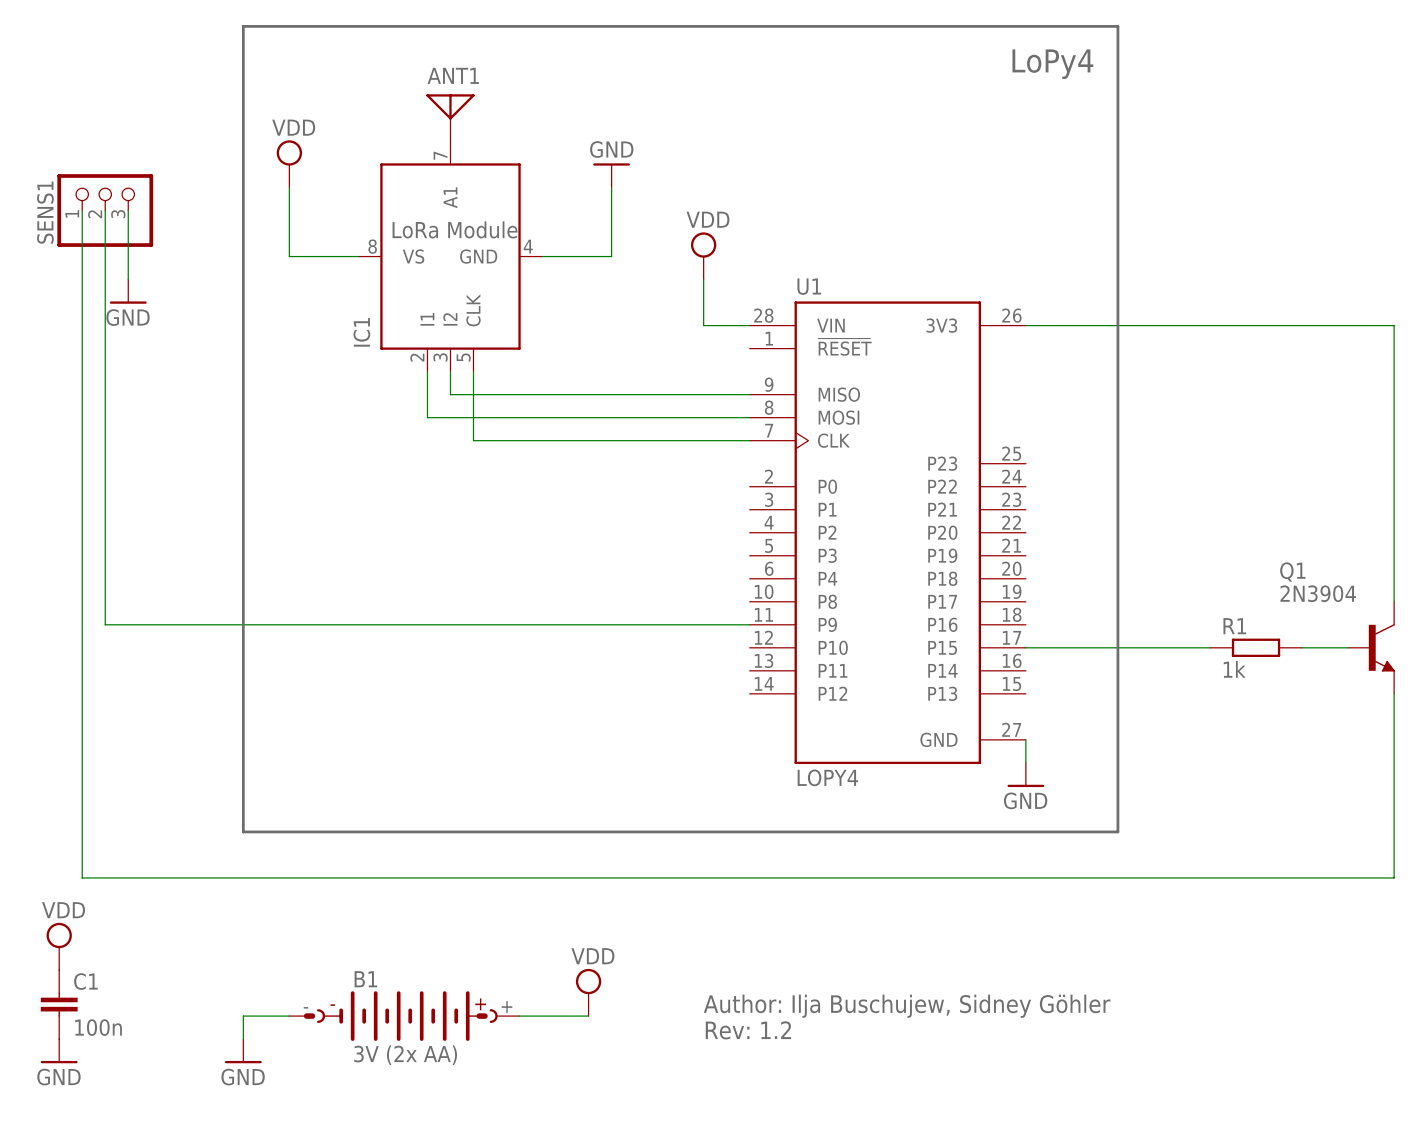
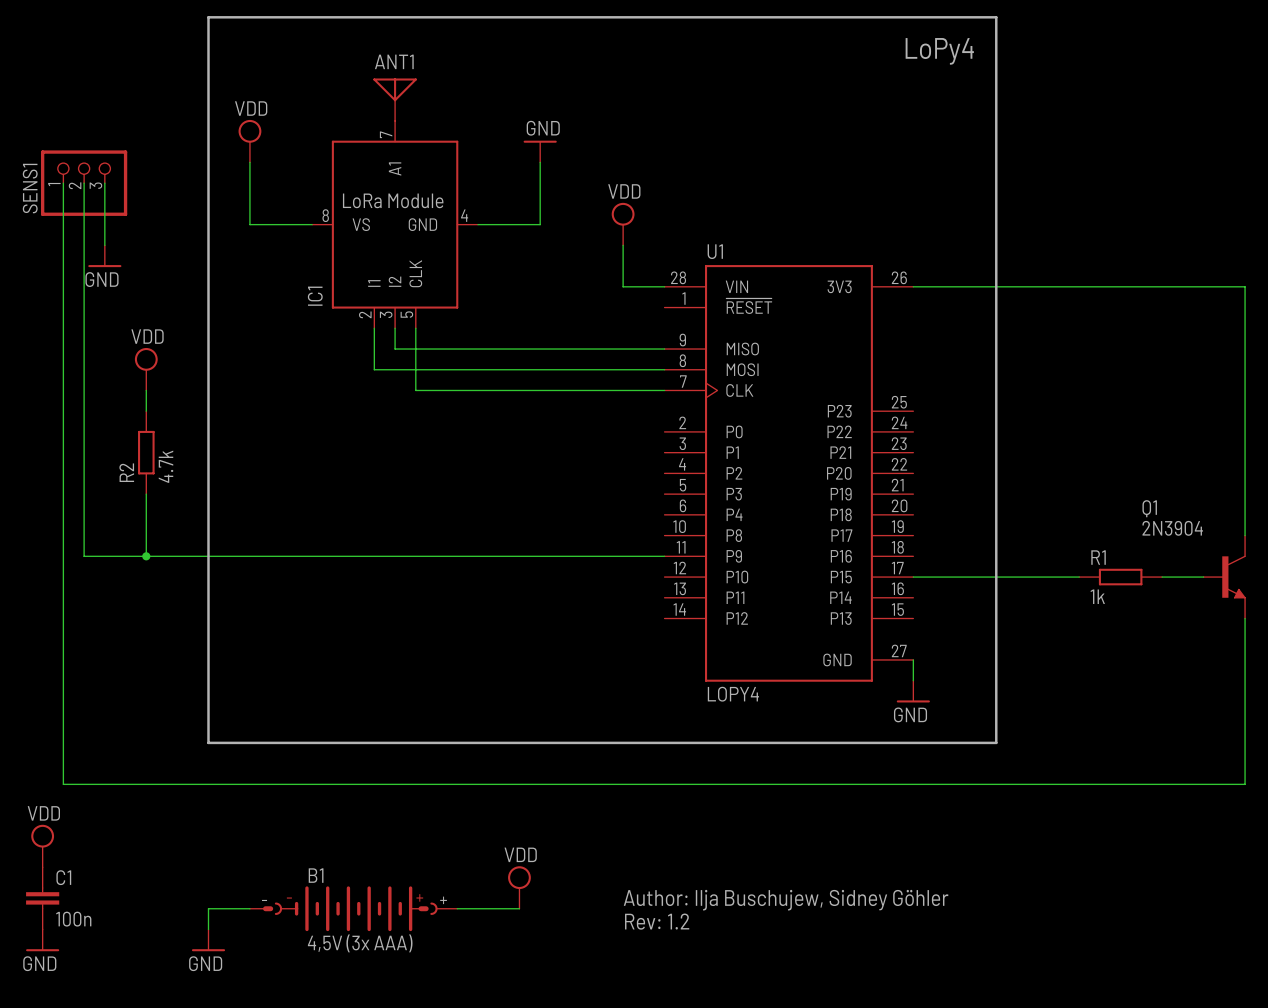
power symbol: none -> VDD (146, 369)
wire: none -> (146, 390) (146, 411)
R2: none -> 4.7k (146, 452)
wire: none -> (146, 494) (146, 556)
junction: none -> (146, 556)
B1 value: 3V (2x AA) (405, 1055) -> 4,5V (3x AAA) (360, 943)

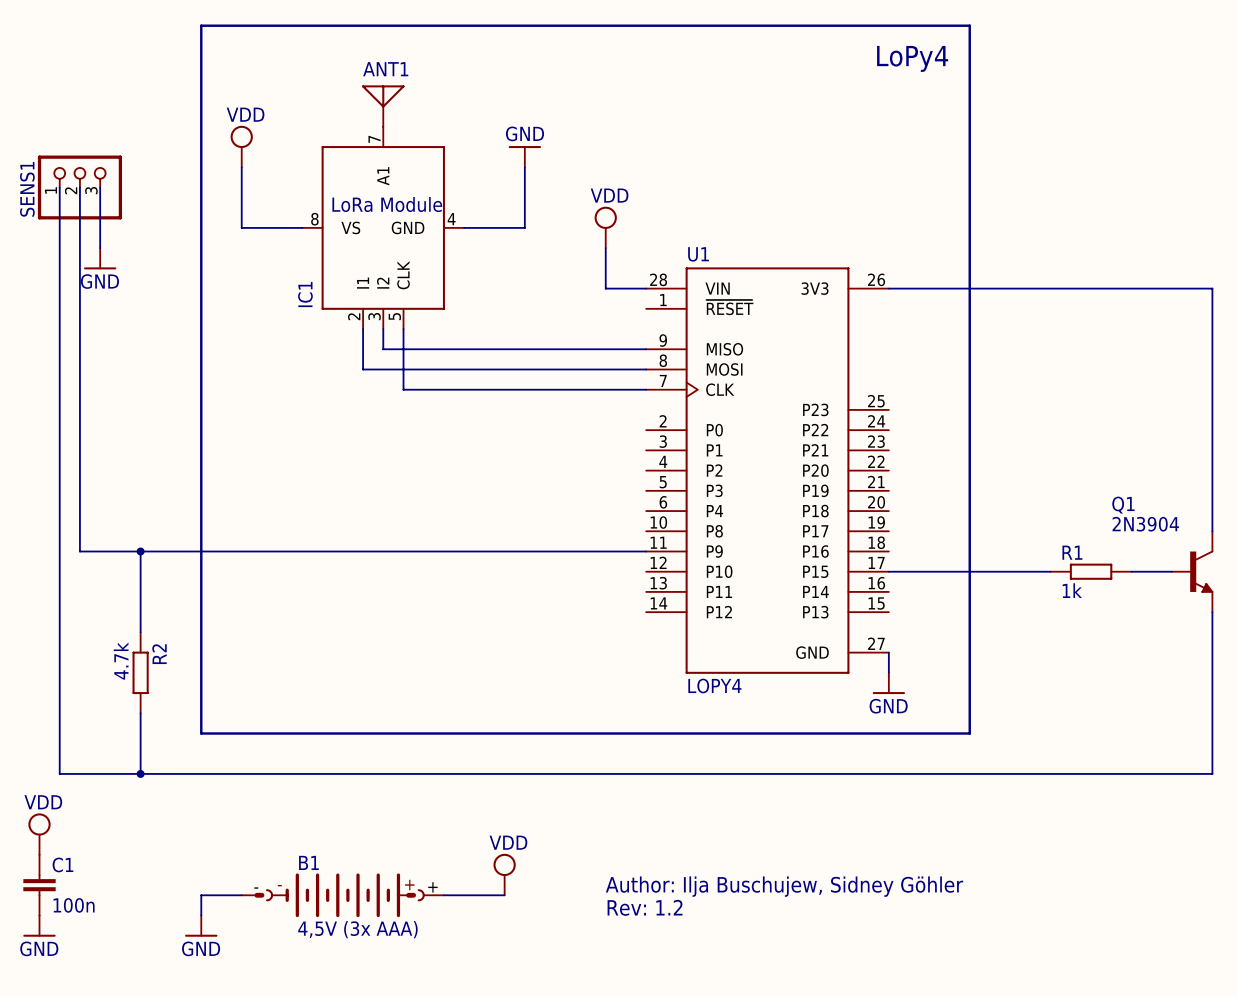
power symbol: VDD (146, 369) -> none
wire: (146, 390) (146, 411) -> none
R2 position: (146, 452) -> (140, 672)
R2 value position: 4.7k (166, 466) -> 4.7k (121, 661)
R2 name position: R2 (126, 472) -> R2 (159, 654)
wire: (146, 494) (146, 556) -> (140, 632) (140, 551)
wire: none -> (140, 713) (140, 773)
junction: none -> (140, 773)

